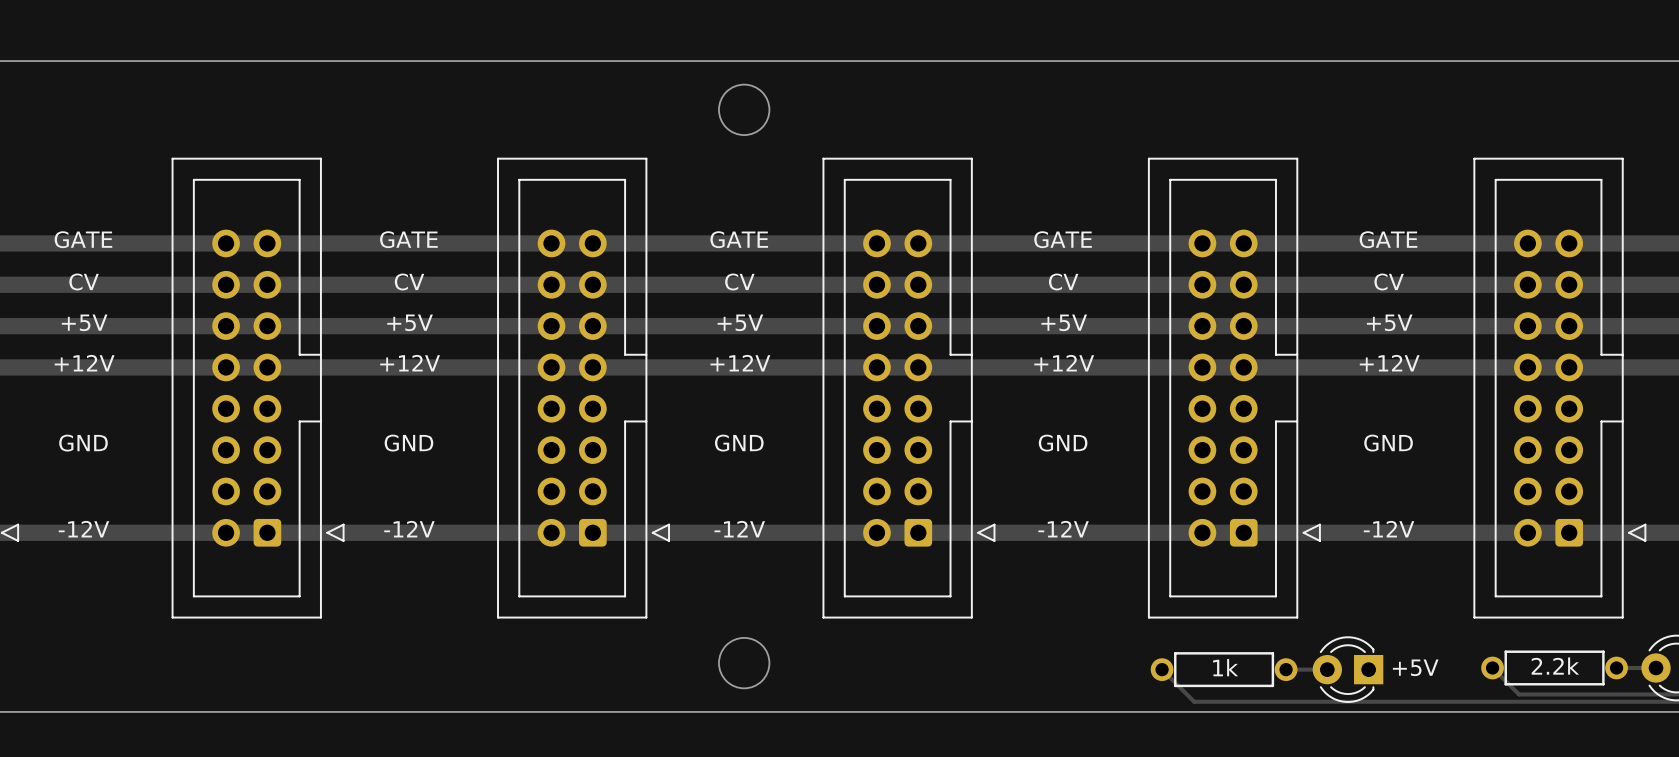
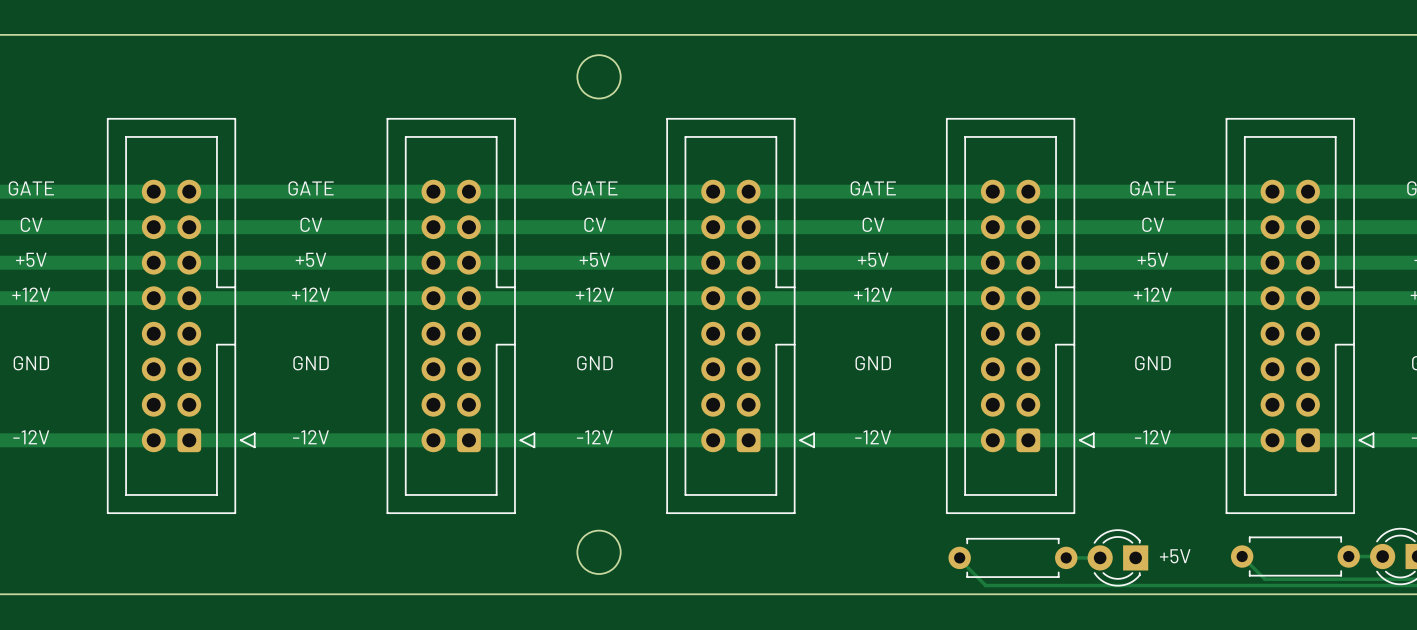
part footprint: [1481, 650, 1628, 686] -> [1230, 536, 1360, 577]
part footprint: [1150, 652, 1298, 688] -> [948, 537, 1078, 578]
part value: 2.2k (1555, 666) -> none
part value: 1k (1225, 667) -> none

